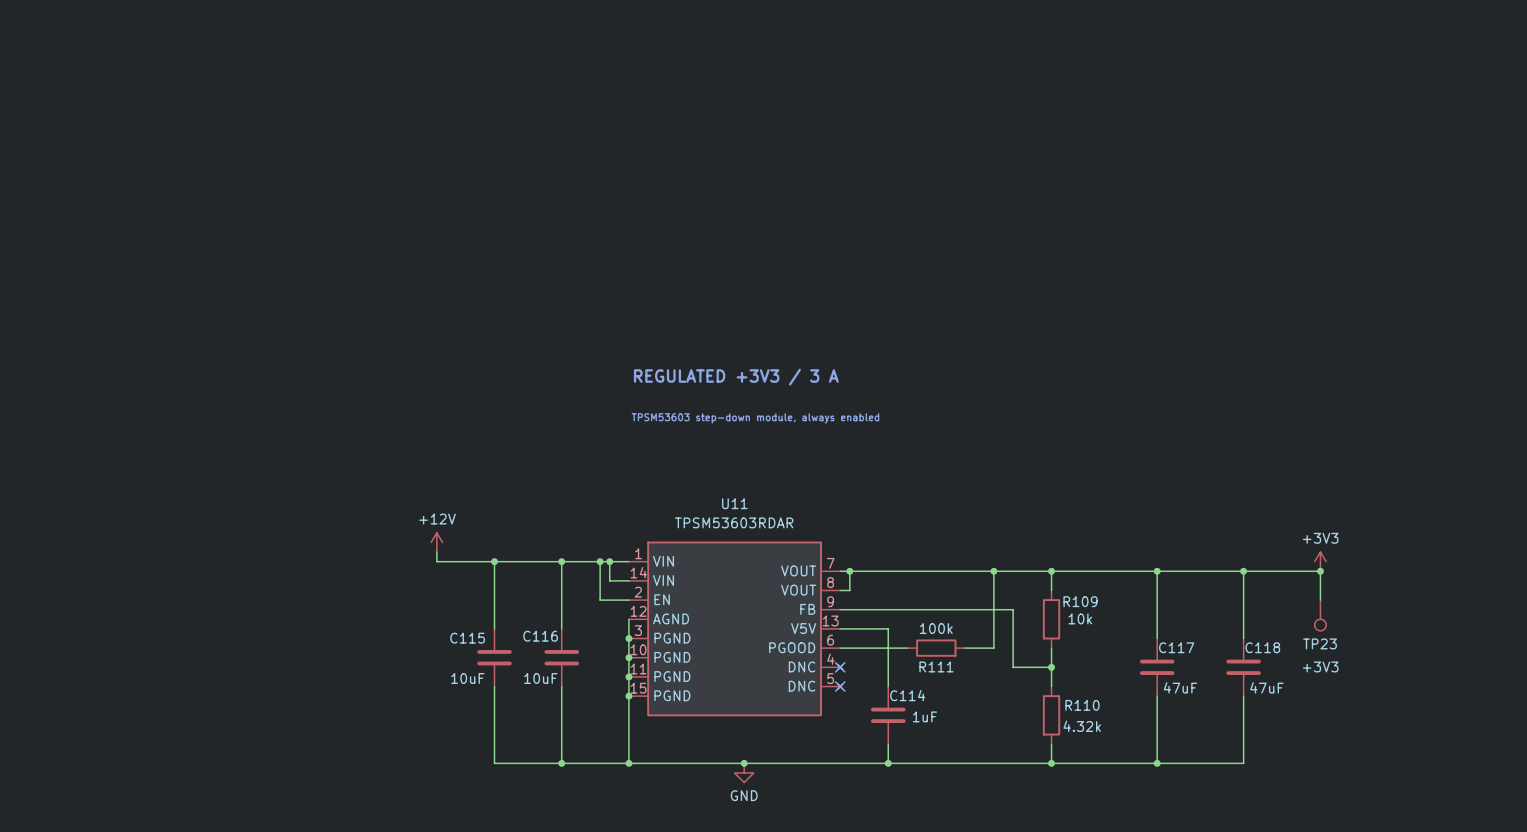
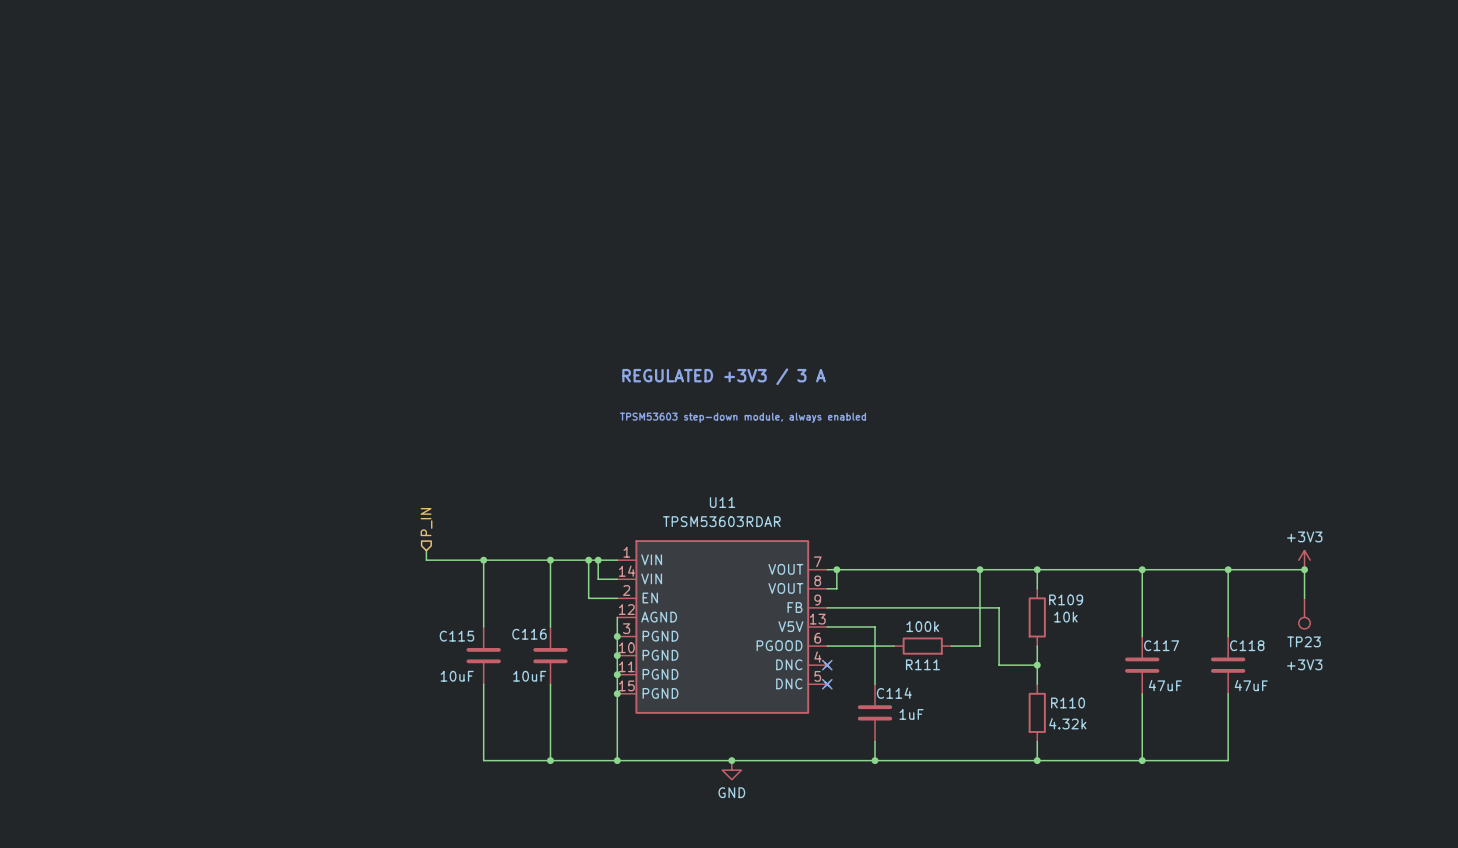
hierarchical label: none -> P_IN (426, 522)
power symbol: +12V (436, 542) -> none

